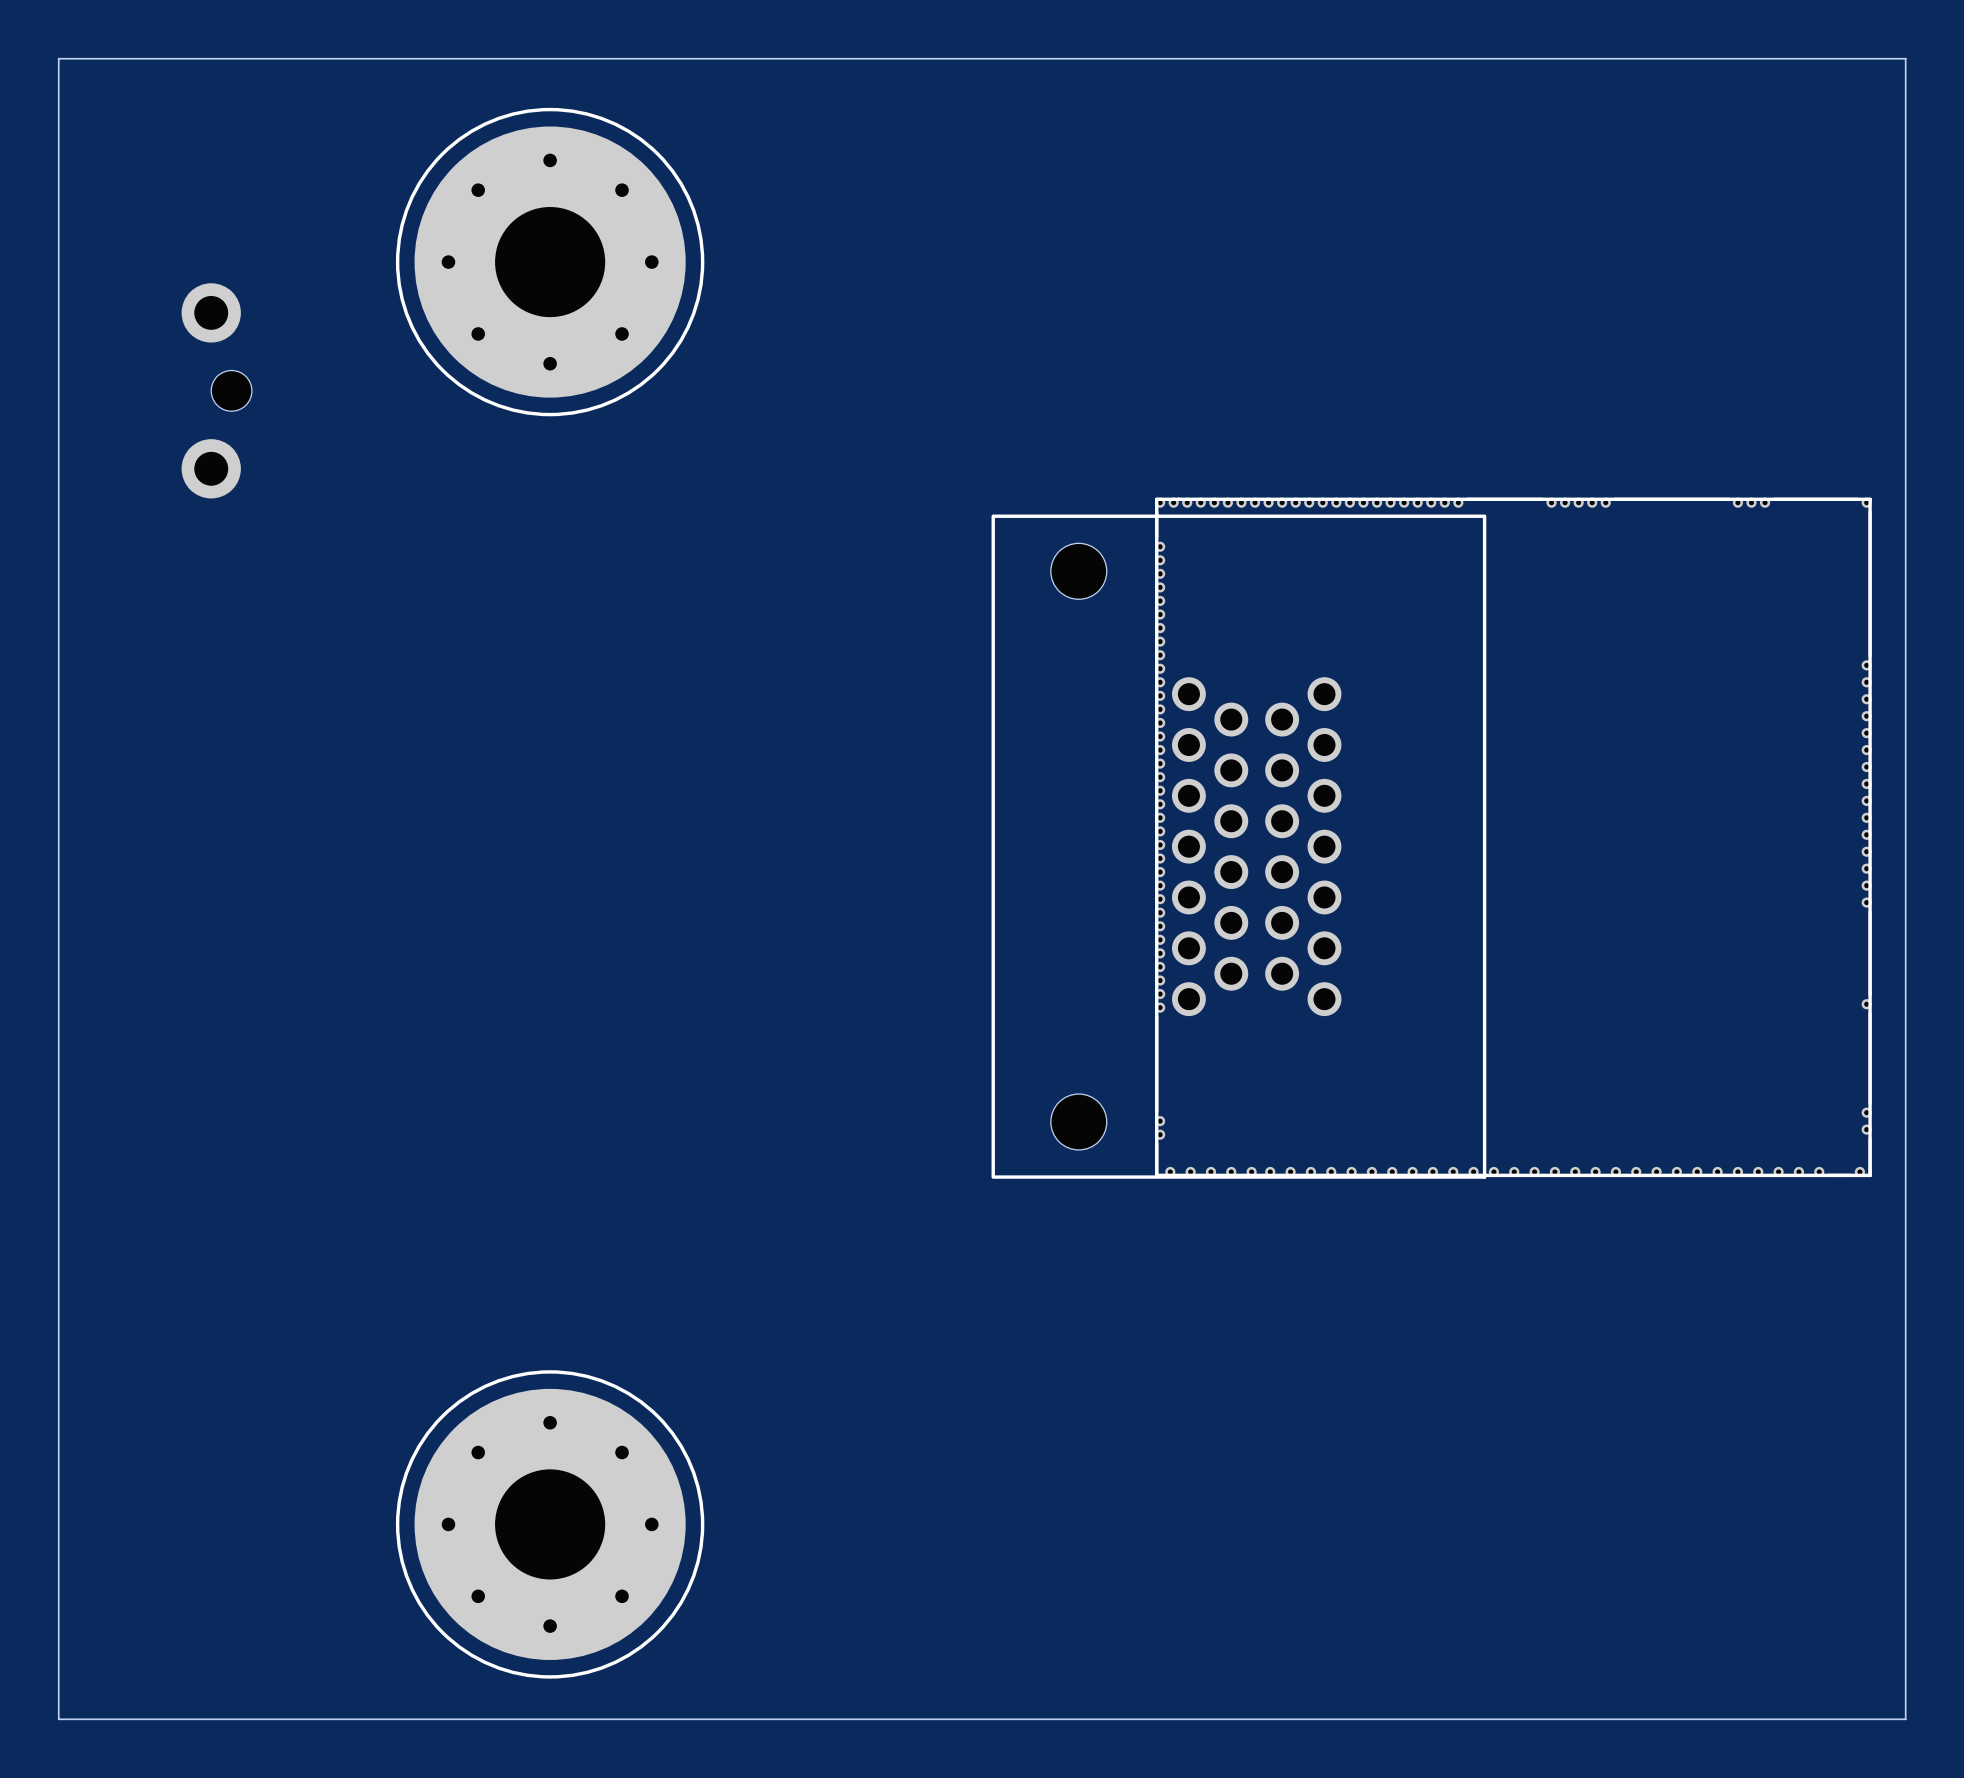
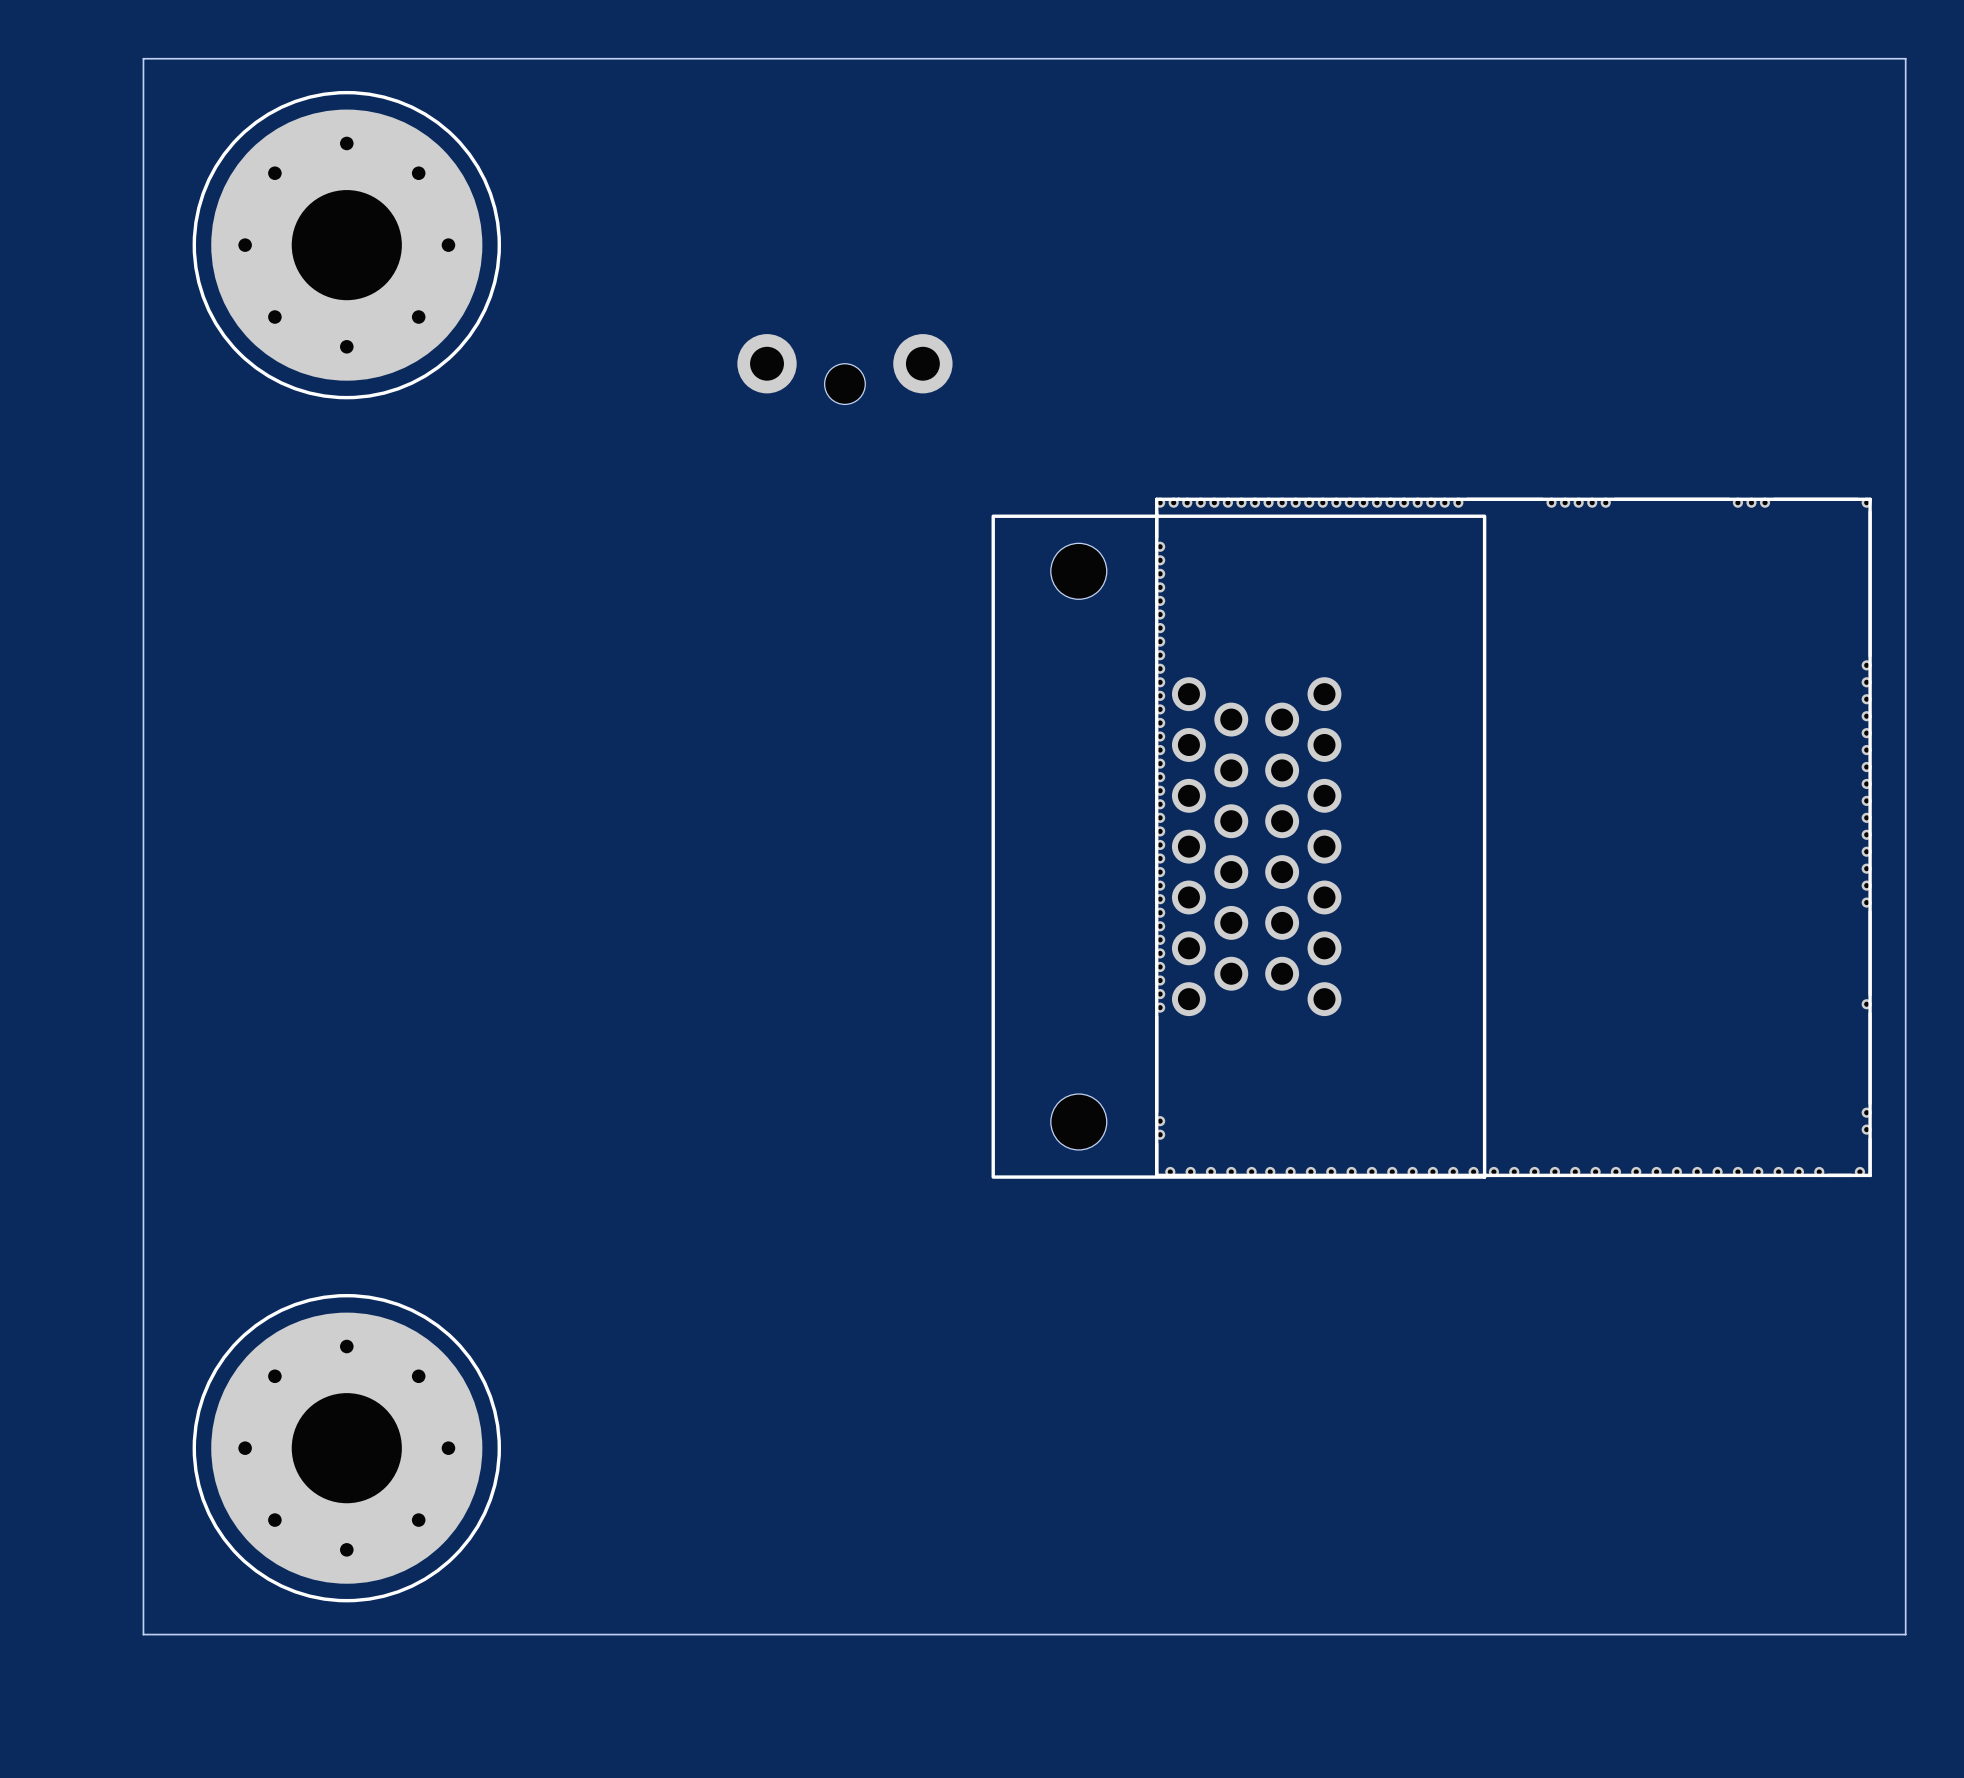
board edge: (143, 58) (58, 58) (58, 1719) (1905, 1719) (1905, 1634) -> (143, 58) (143, 1634) (1905, 1634)
part position: (550, 262) -> (346, 245)
part: none -> (844, 369)
part: (216, 390) -> none
part position: (550, 1524) -> (346, 1448)

